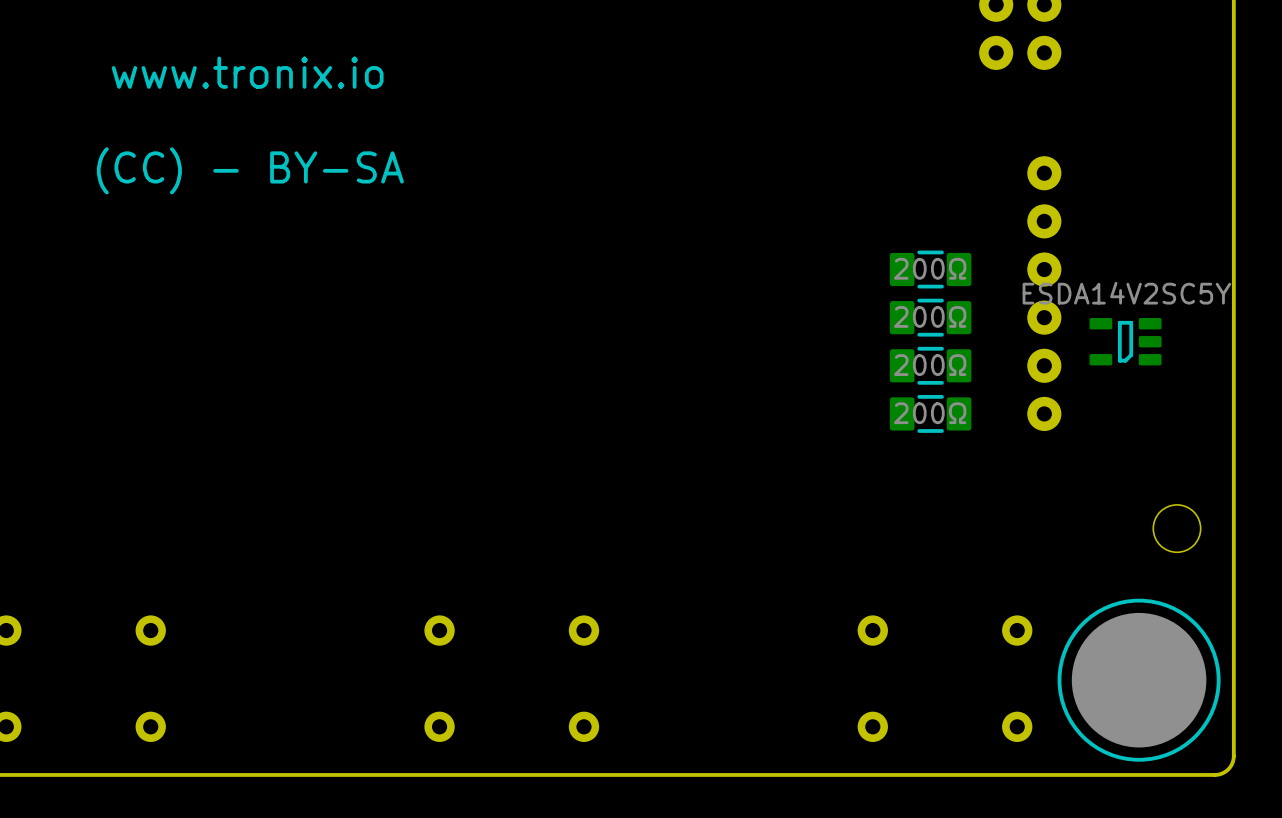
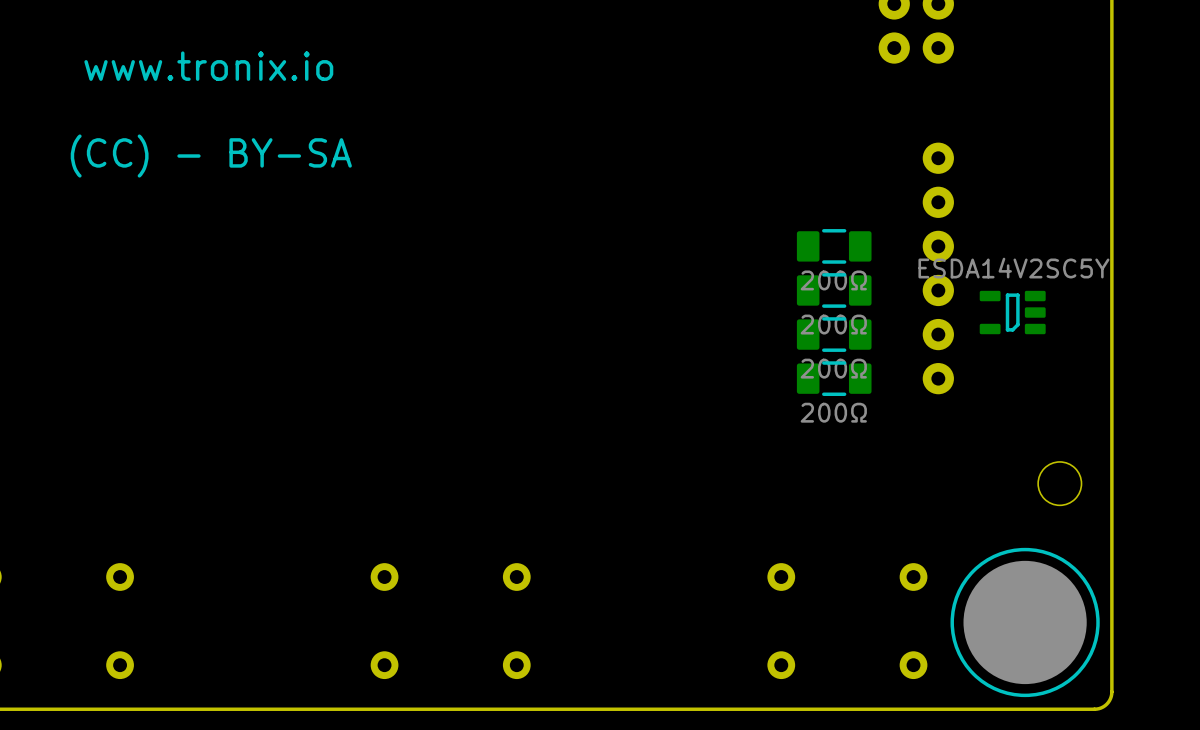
part value position: 200Ω (930, 268) -> 200Ω (833, 280)
part value position: 200Ω (930, 316) -> 200Ω (833, 324)
part value position: 200Ω (930, 365) -> 200Ω (833, 368)
part value position: 200Ω (930, 413) -> 200Ω (833, 412)

